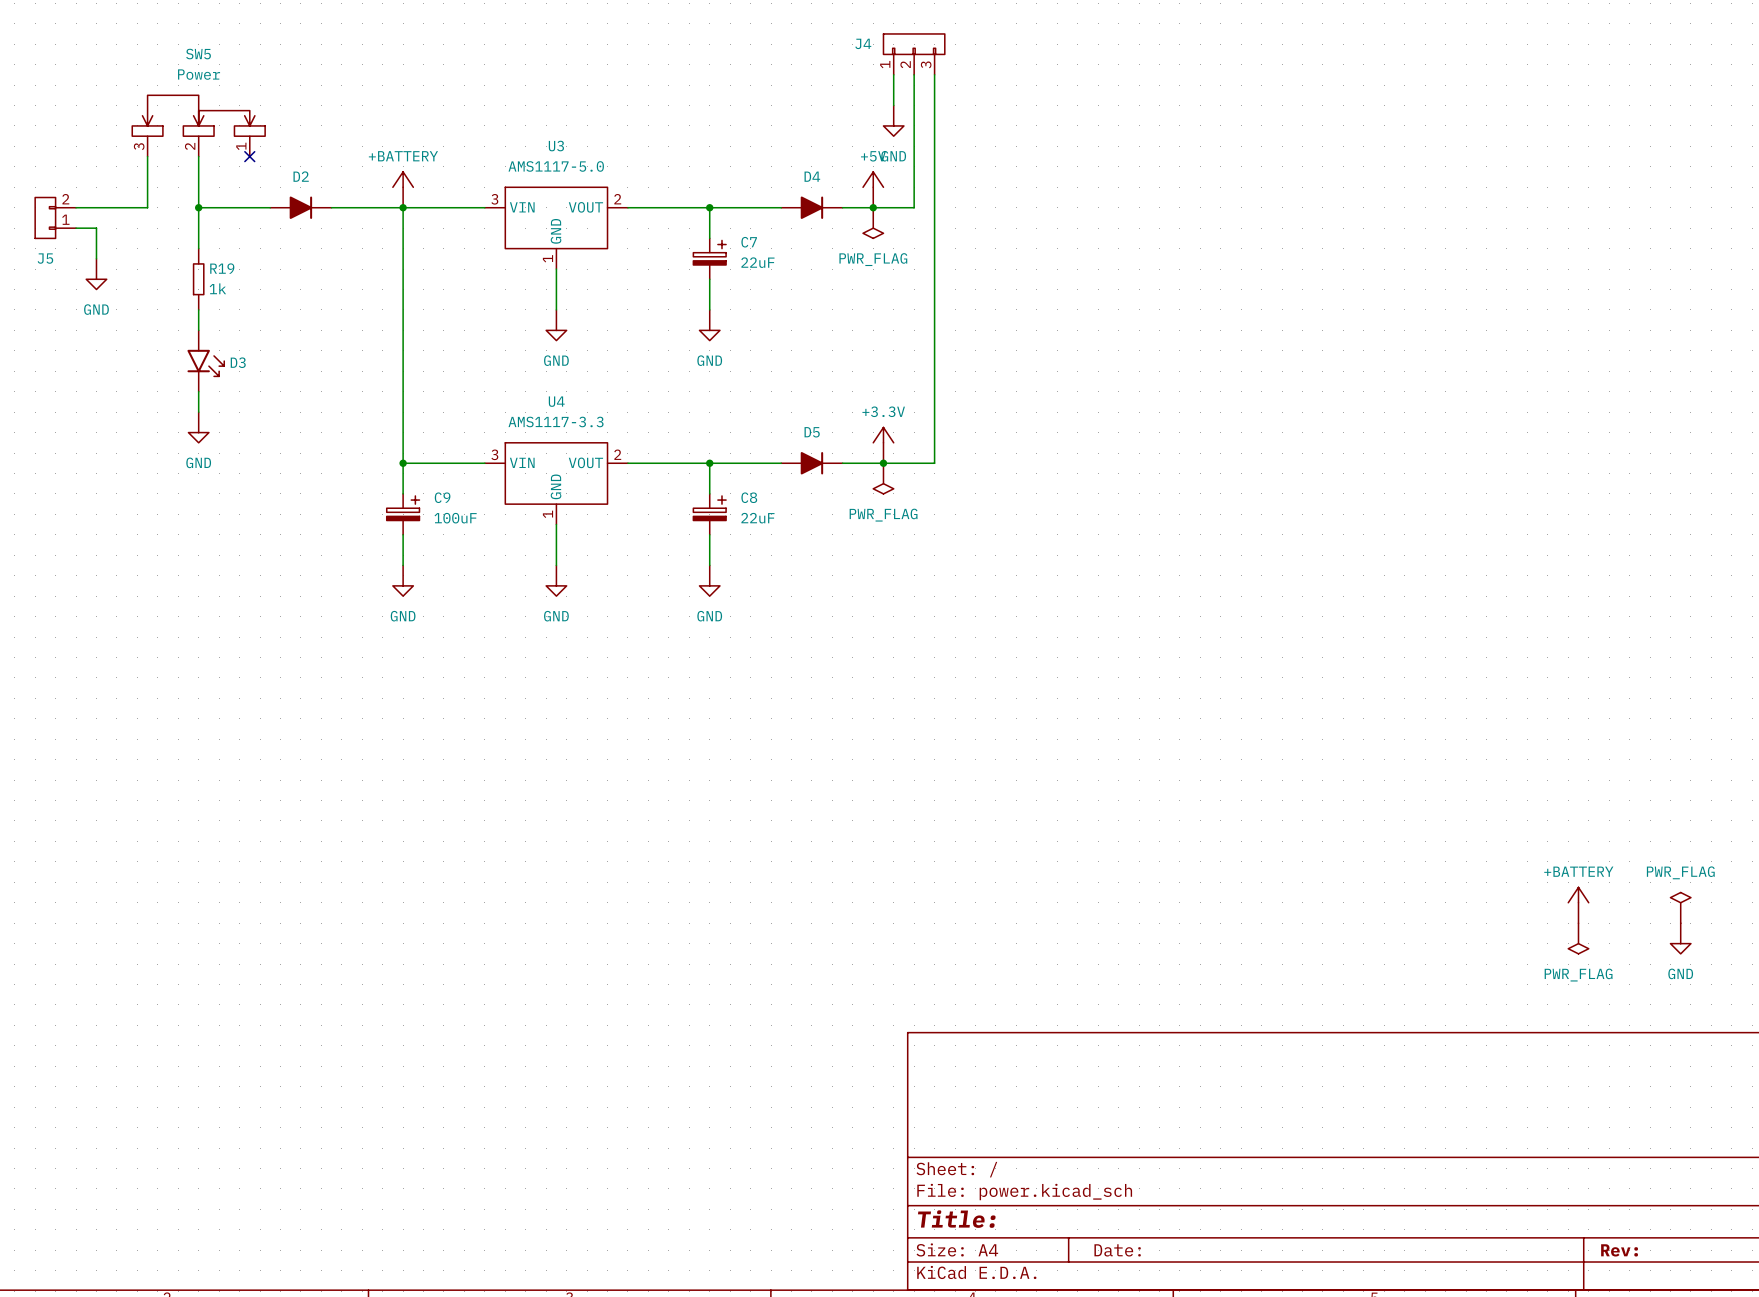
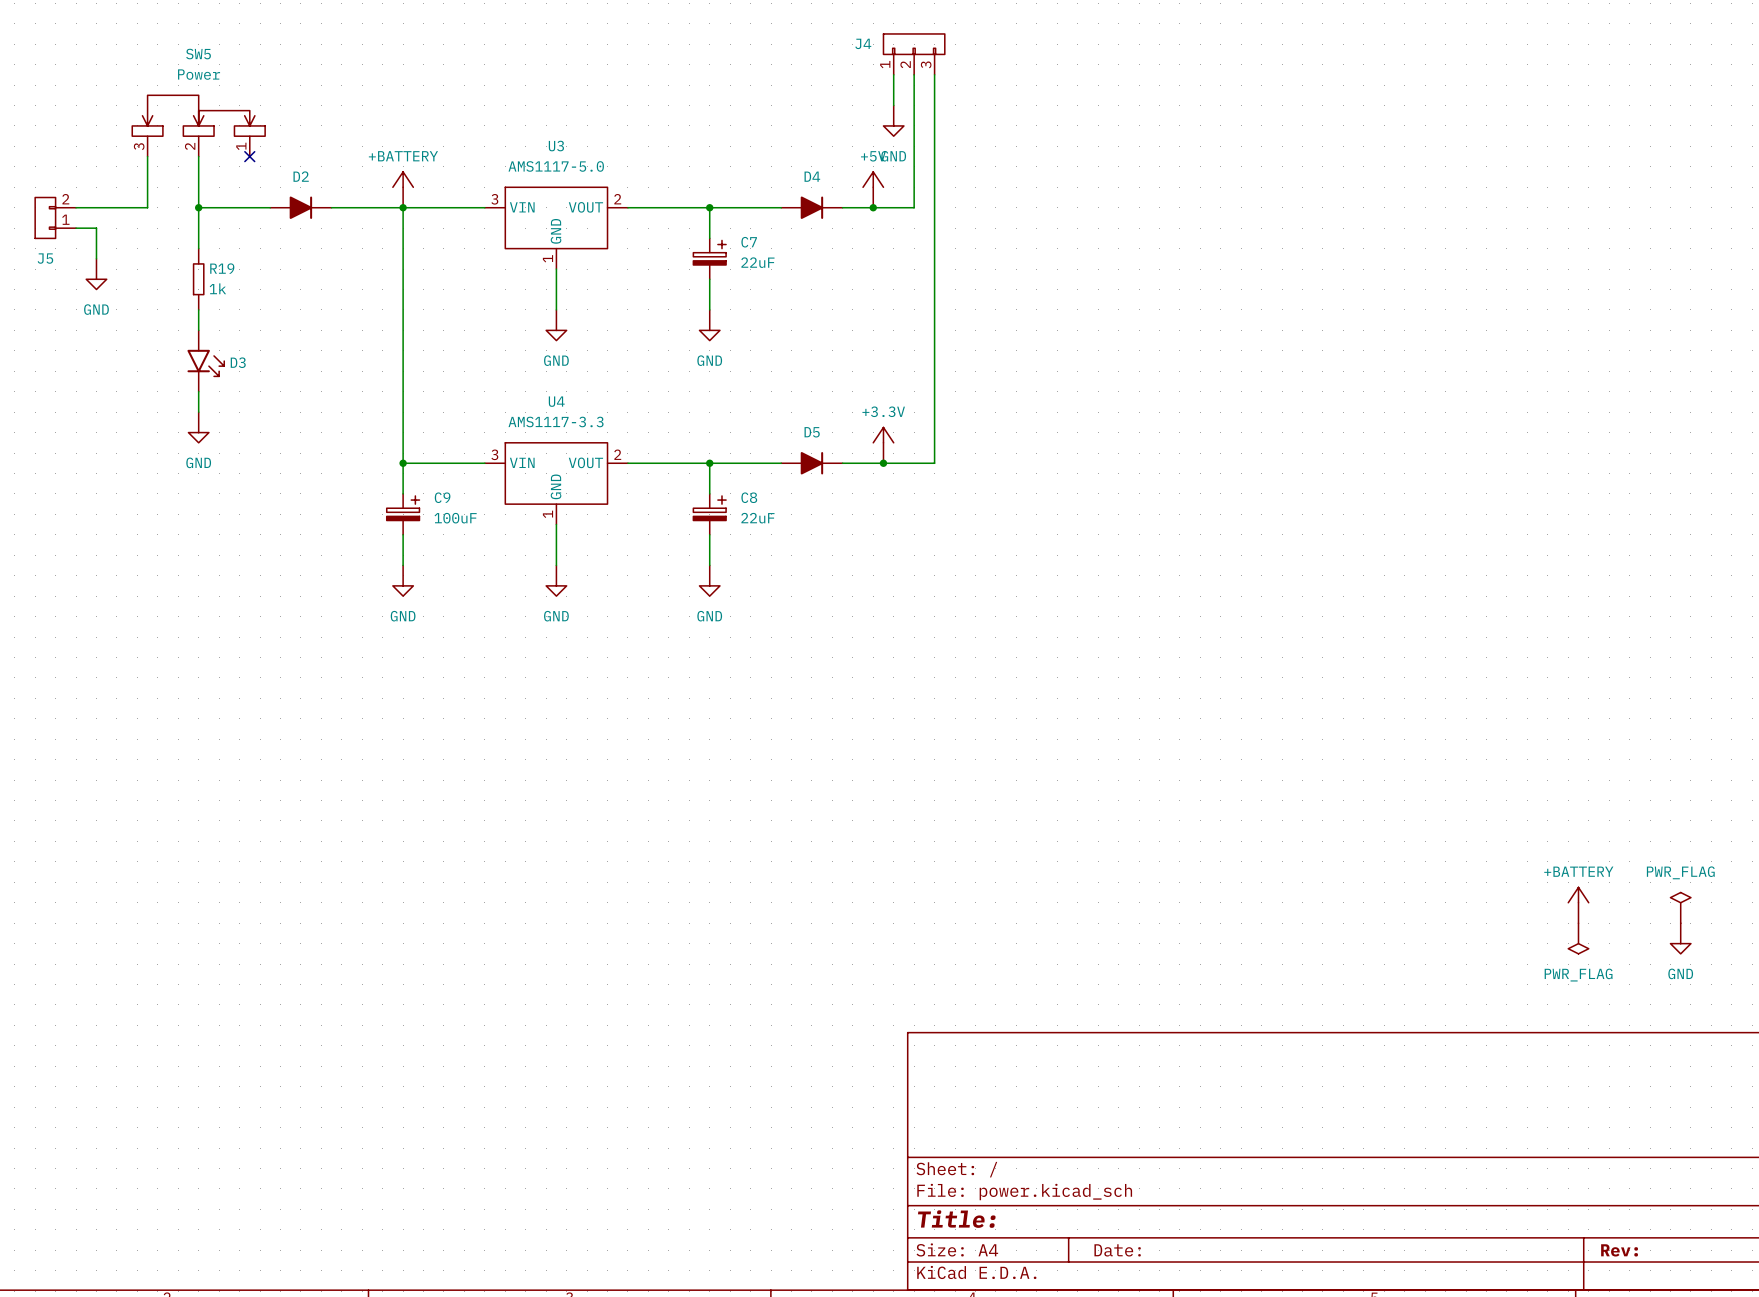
power symbol: PWR_FLAG (873, 223) -> none
power symbol: PWR_FLAG (883, 478) -> none

